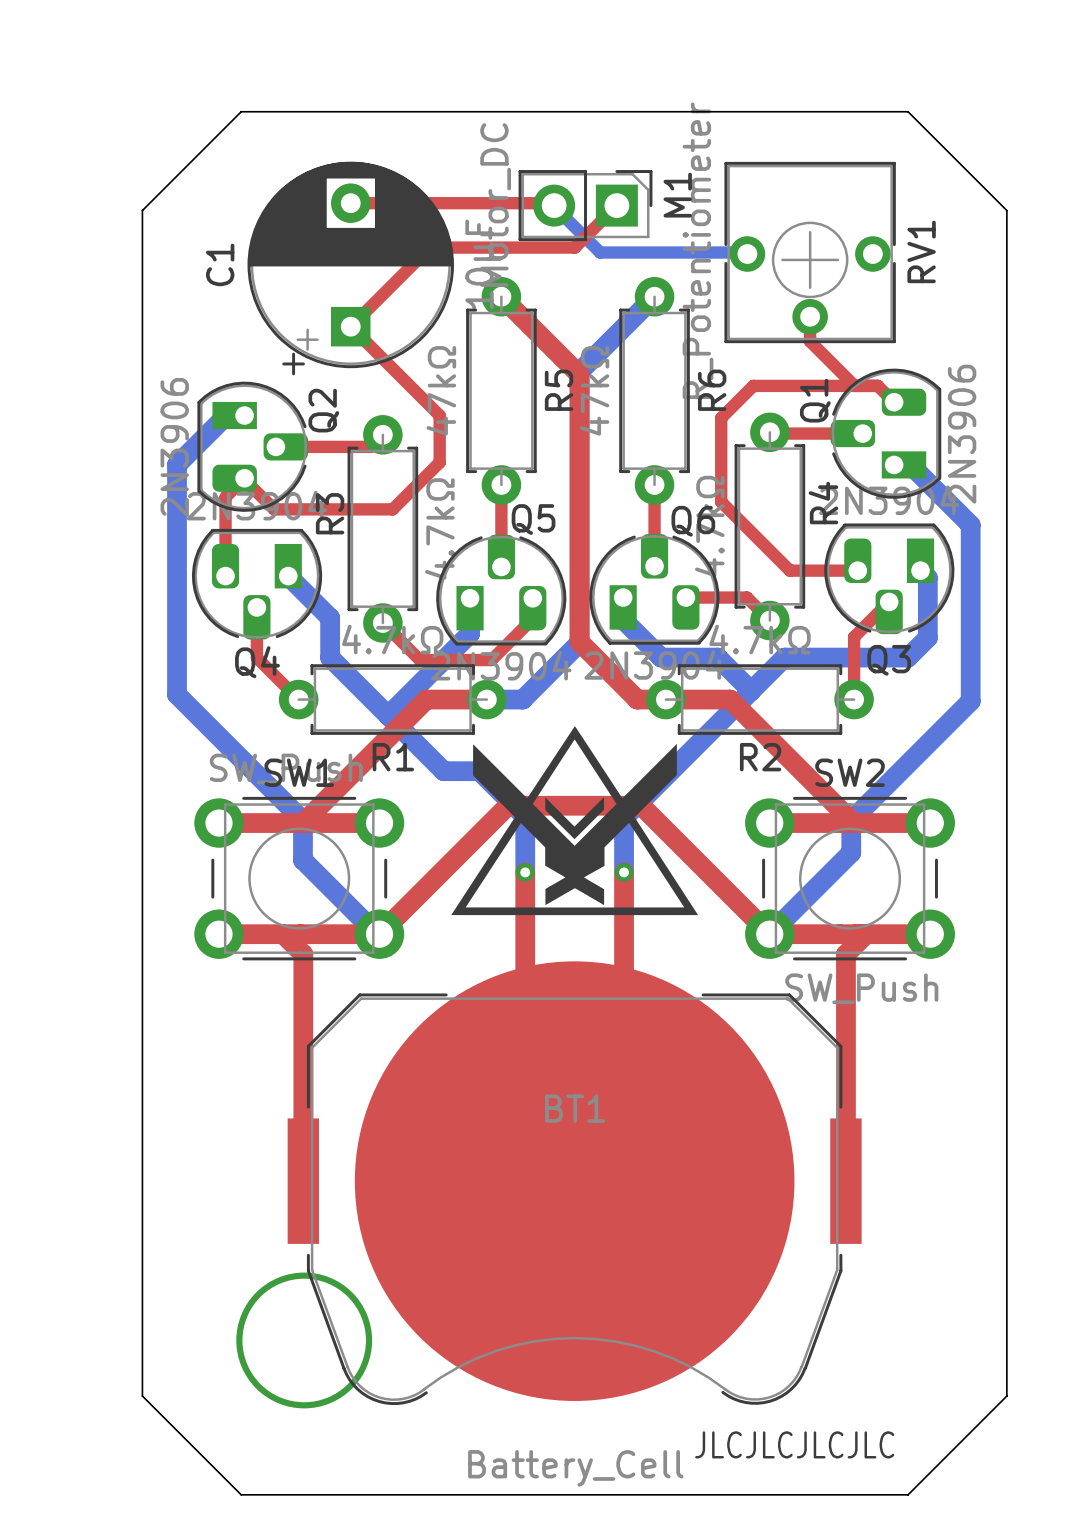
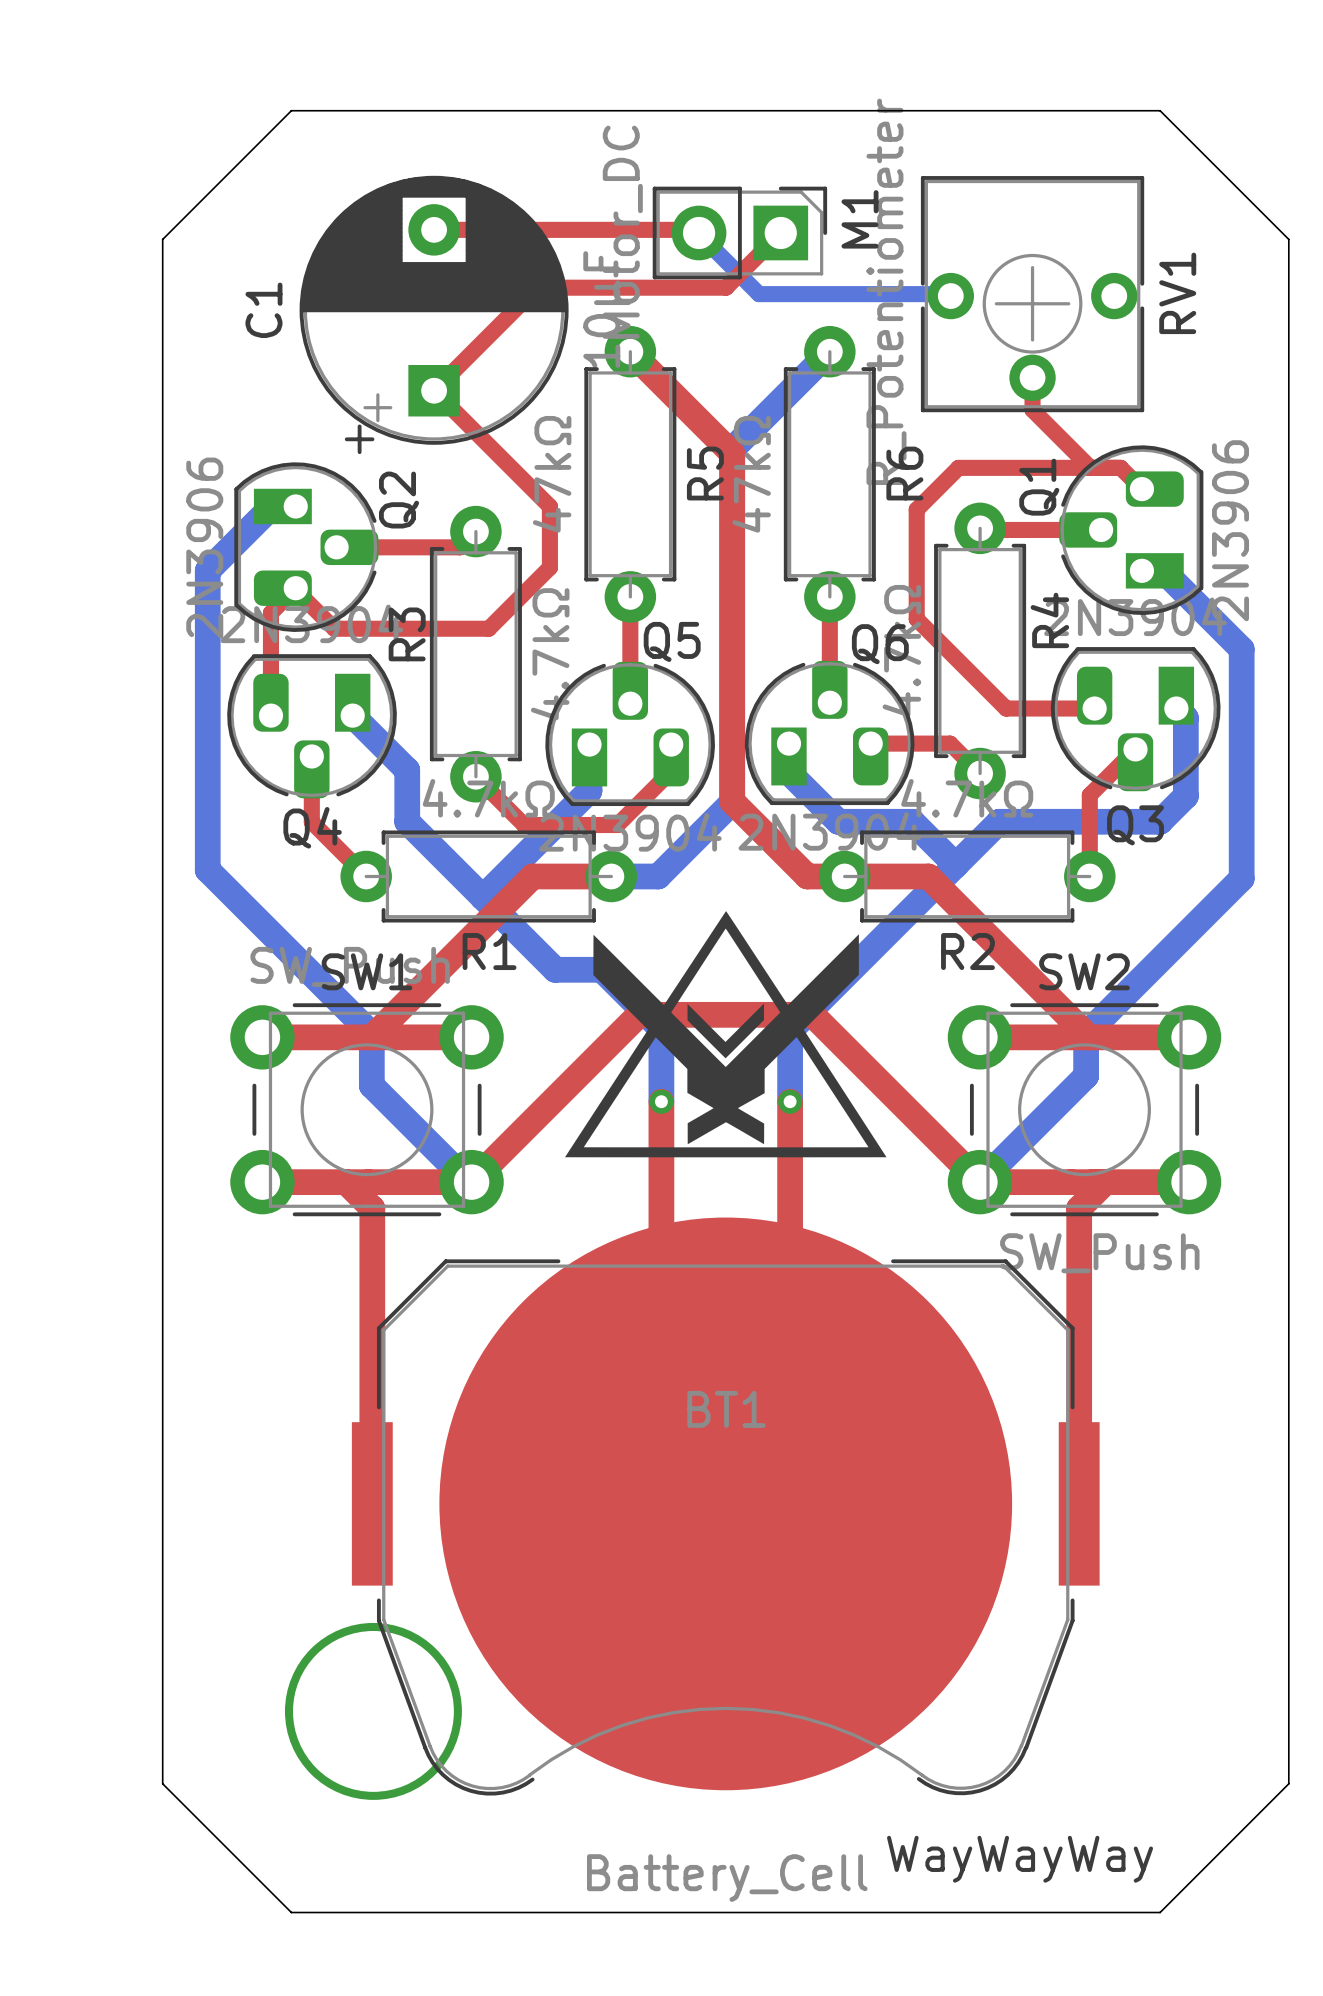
text: JLCJLCJLCJLC (794, 1444) -> WayWayWay (1020, 1859)

